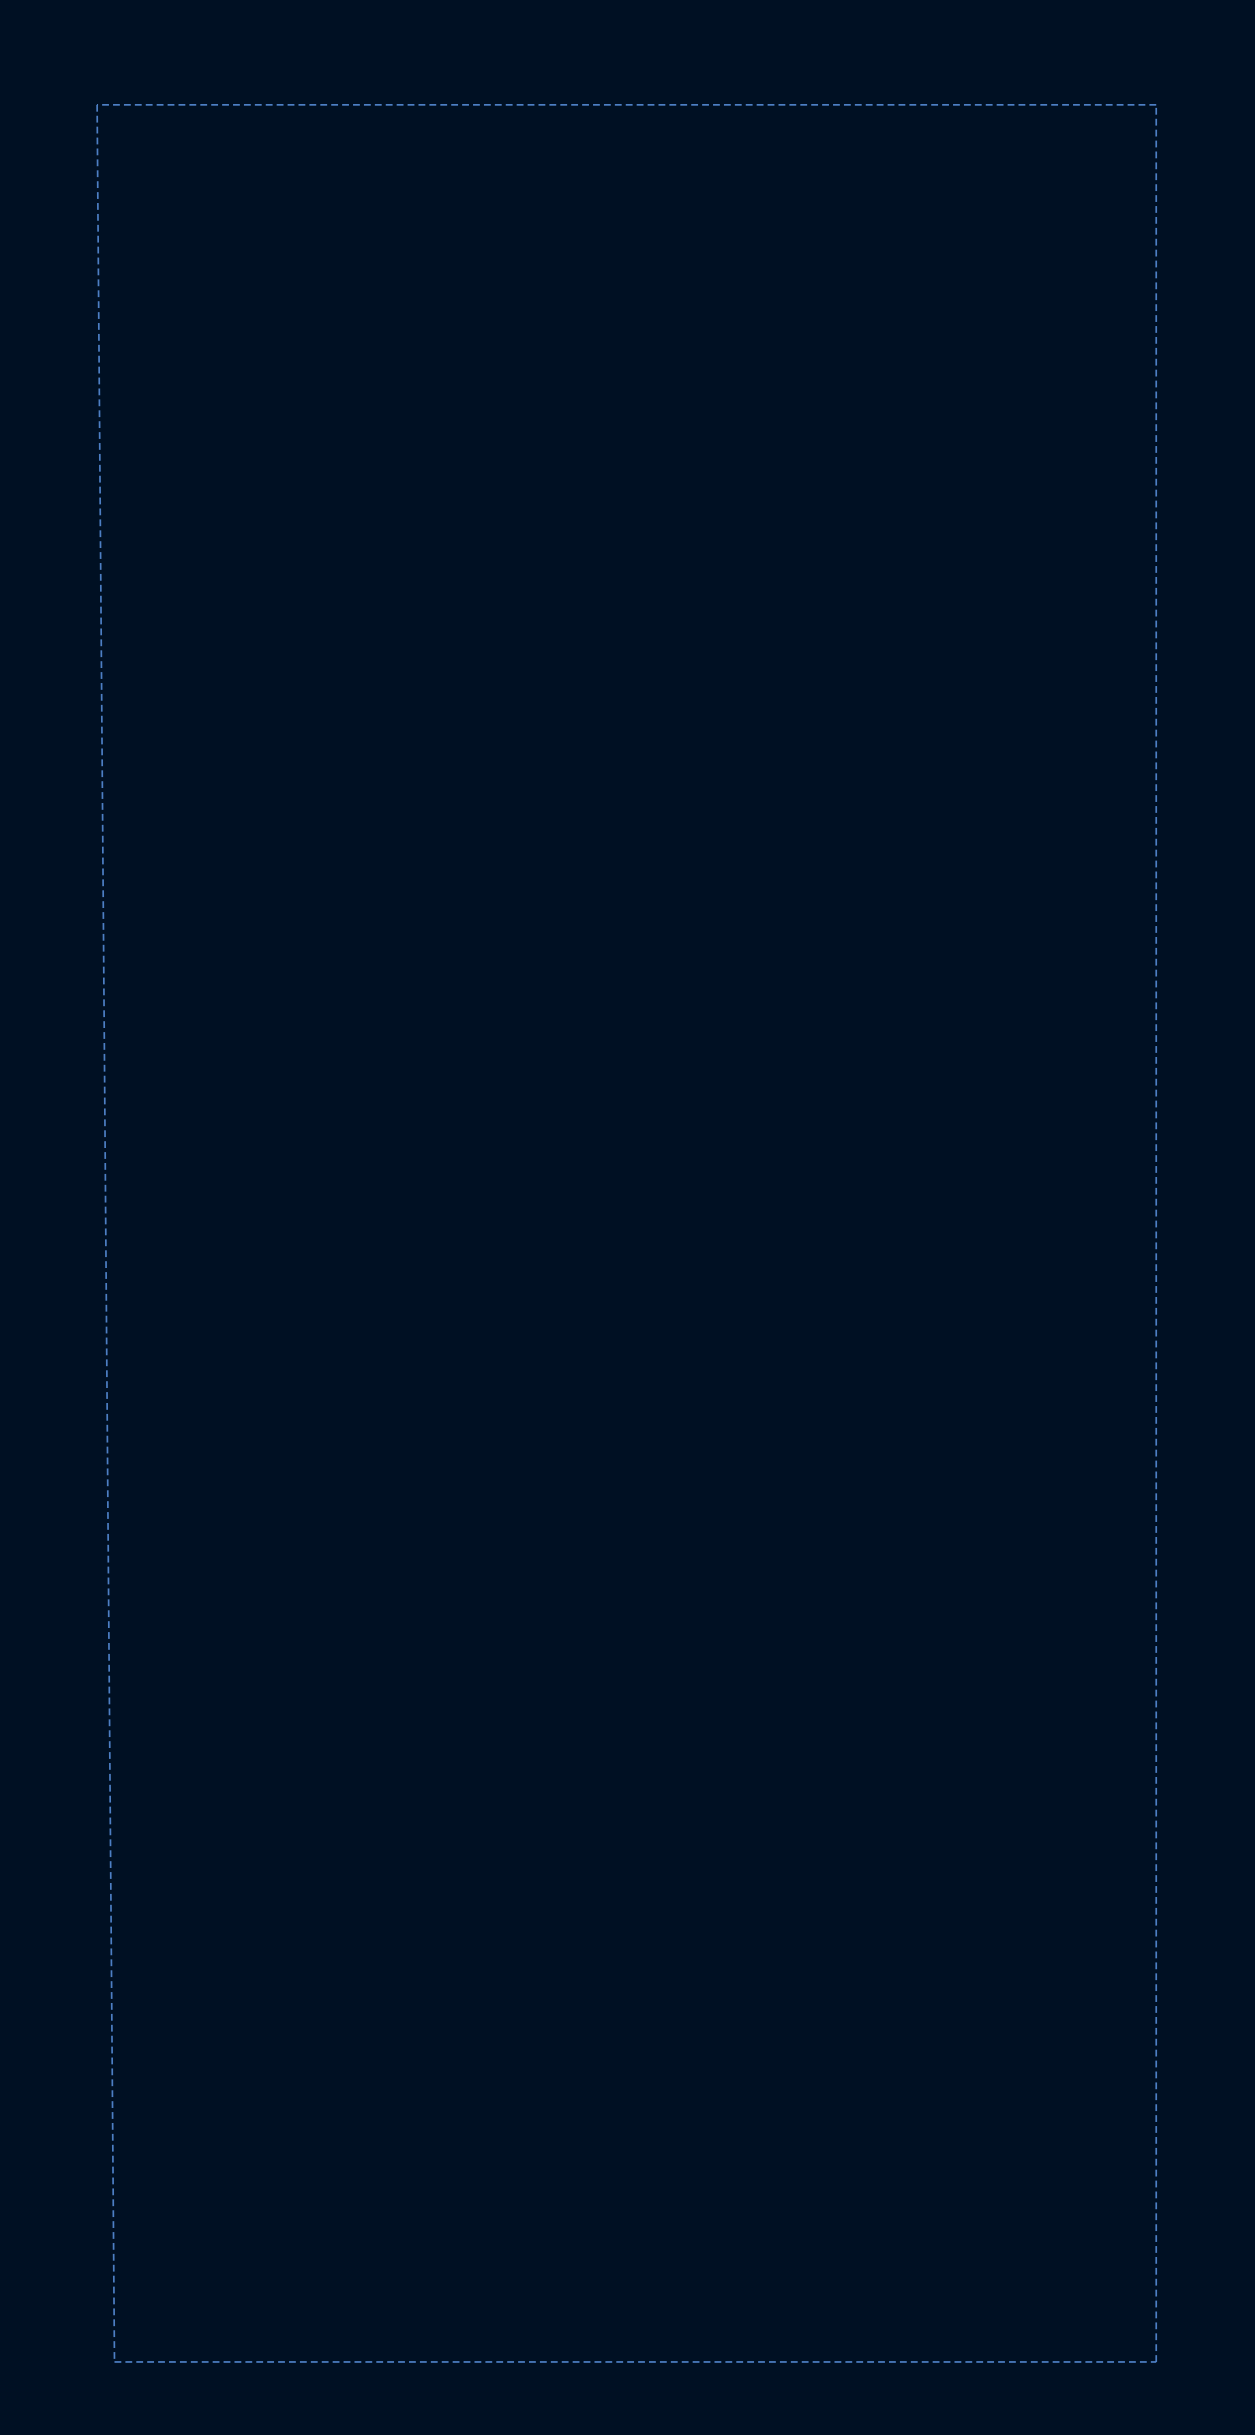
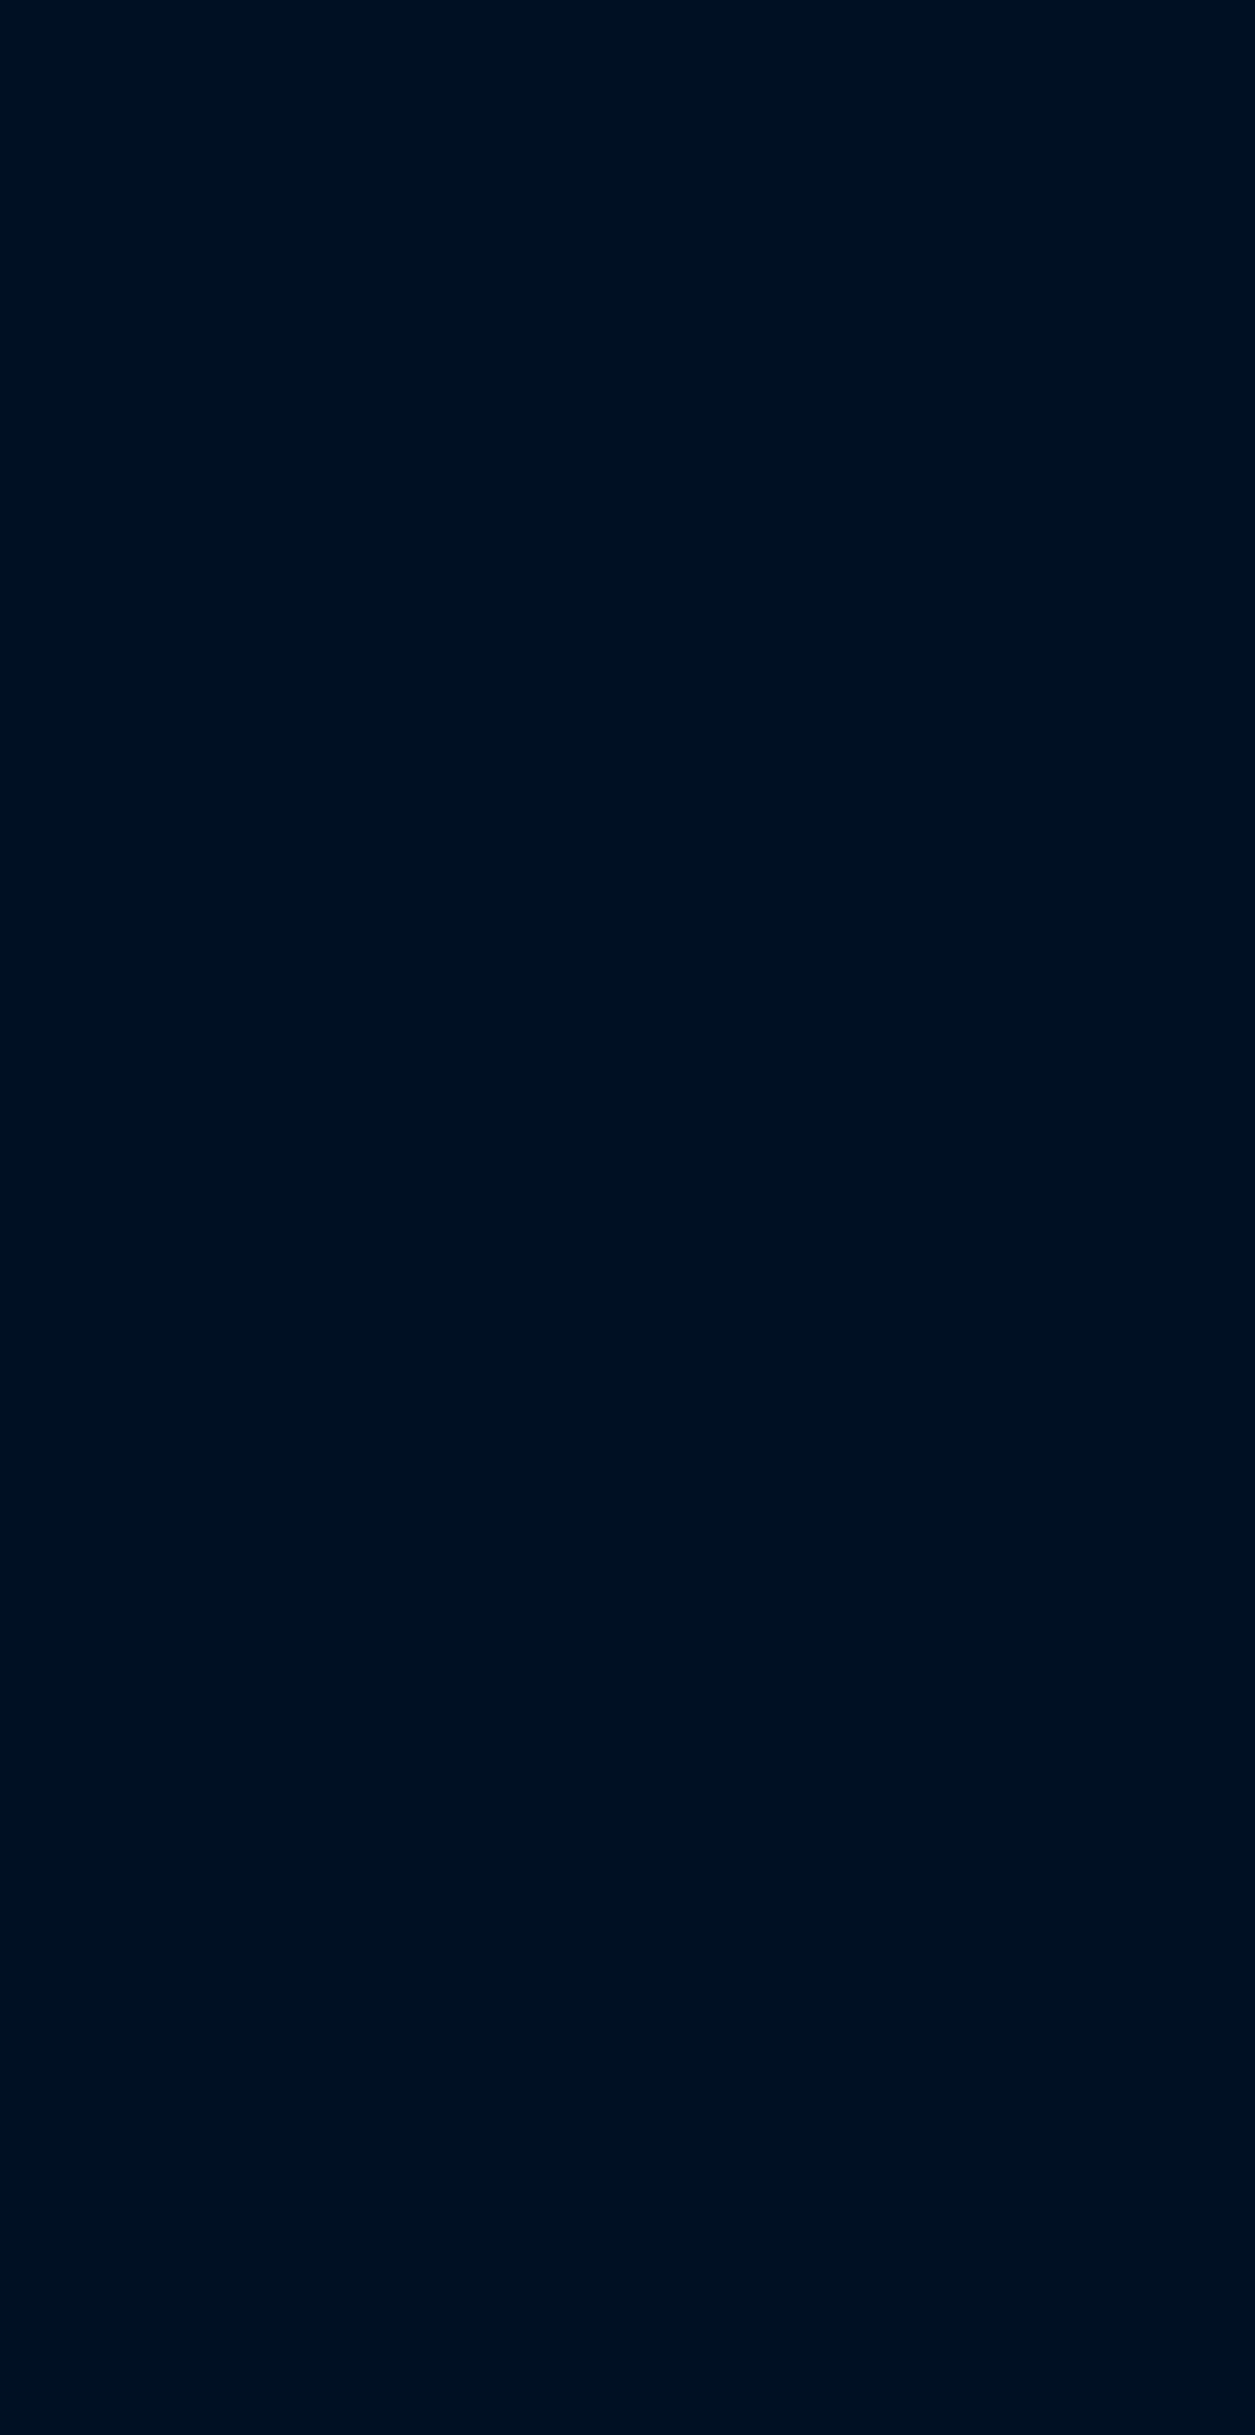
zone outline: (1156, 104) (97, 104) (114, 2361) (1156, 2361) (1156, 104) -> none

